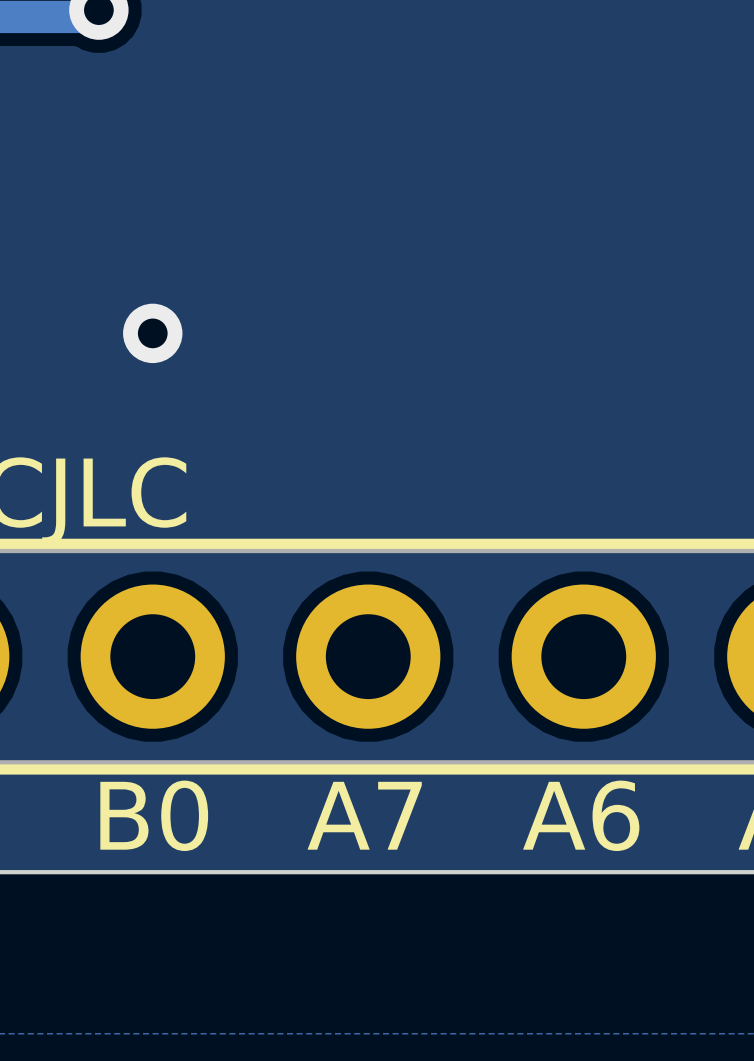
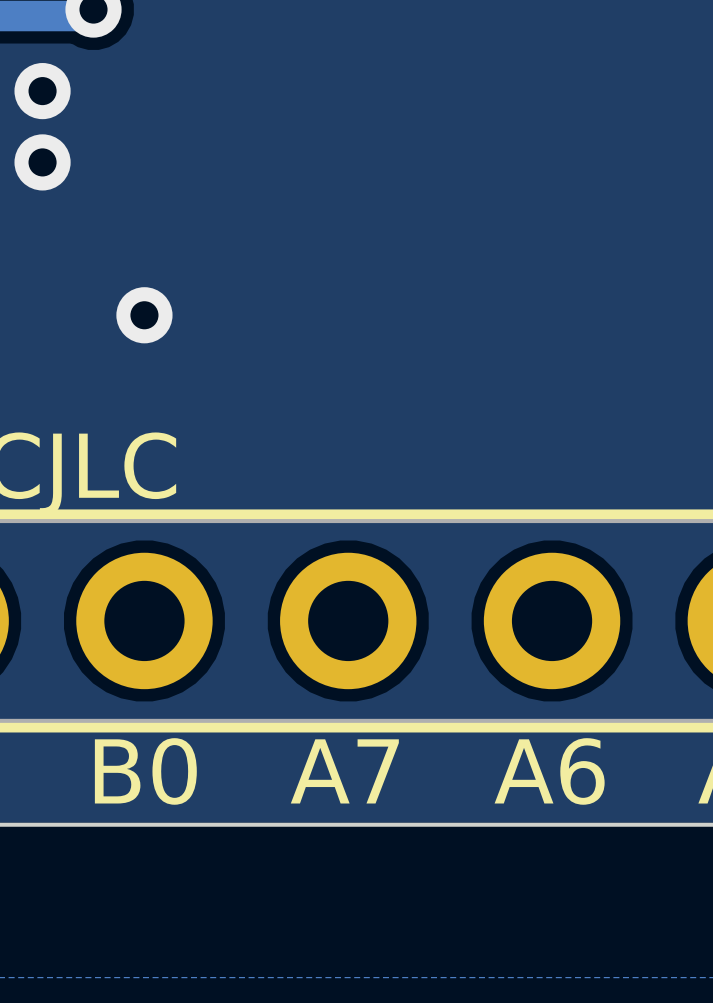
via: none -> (42, 91)
via: none -> (42, 162)

